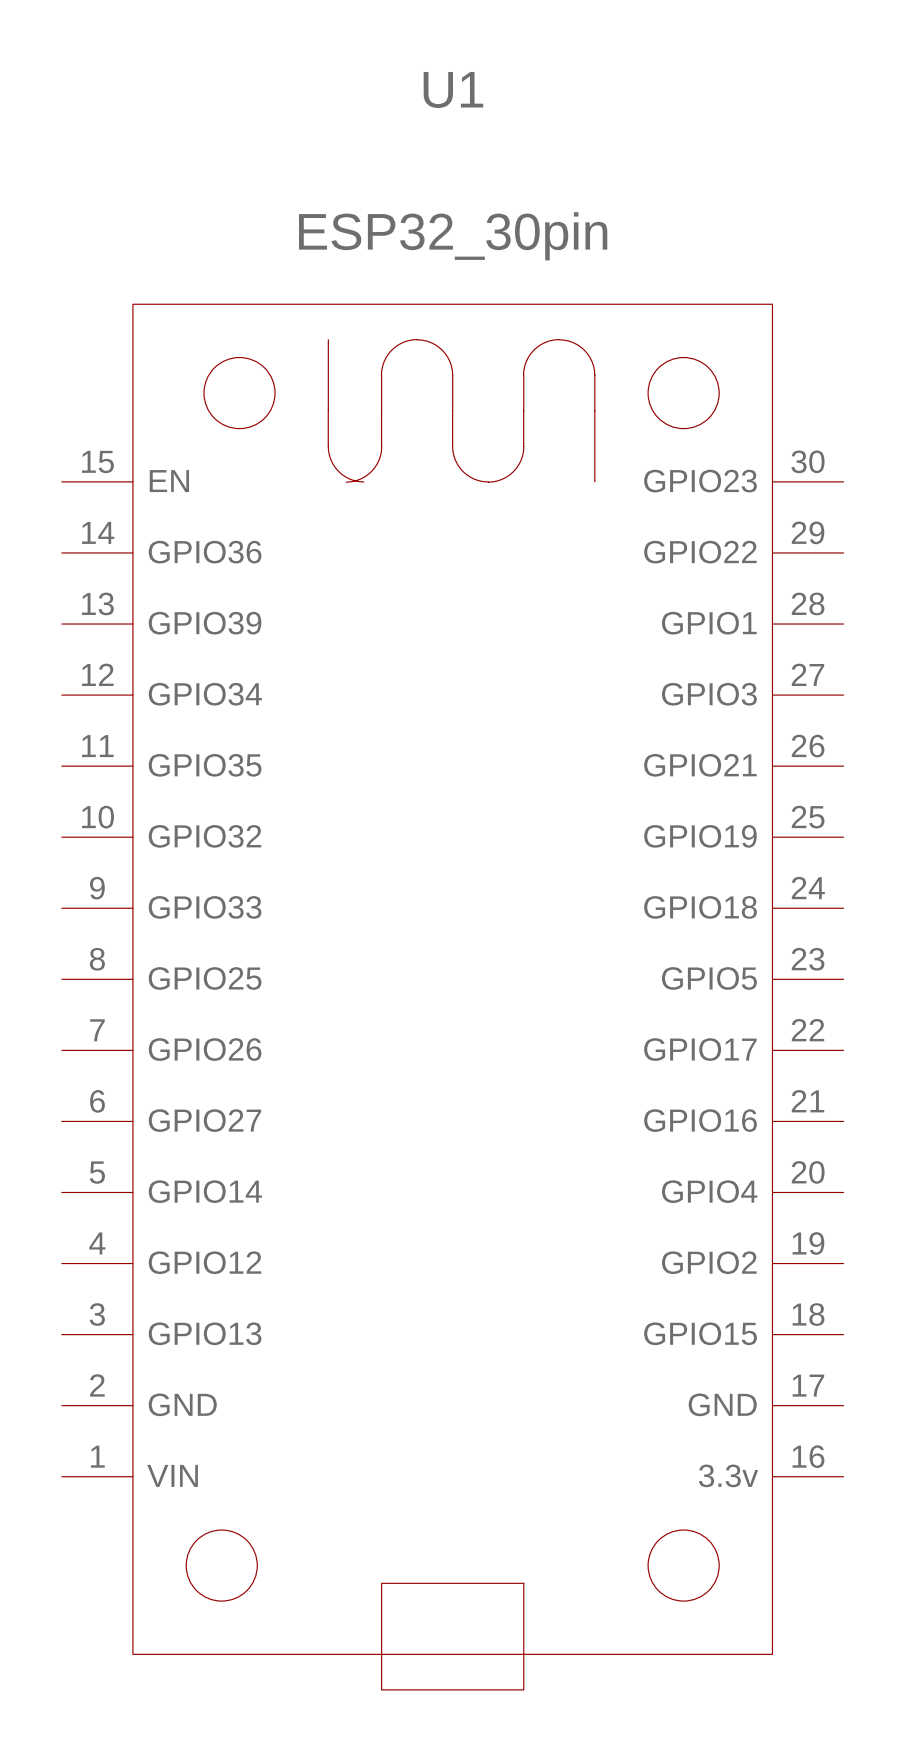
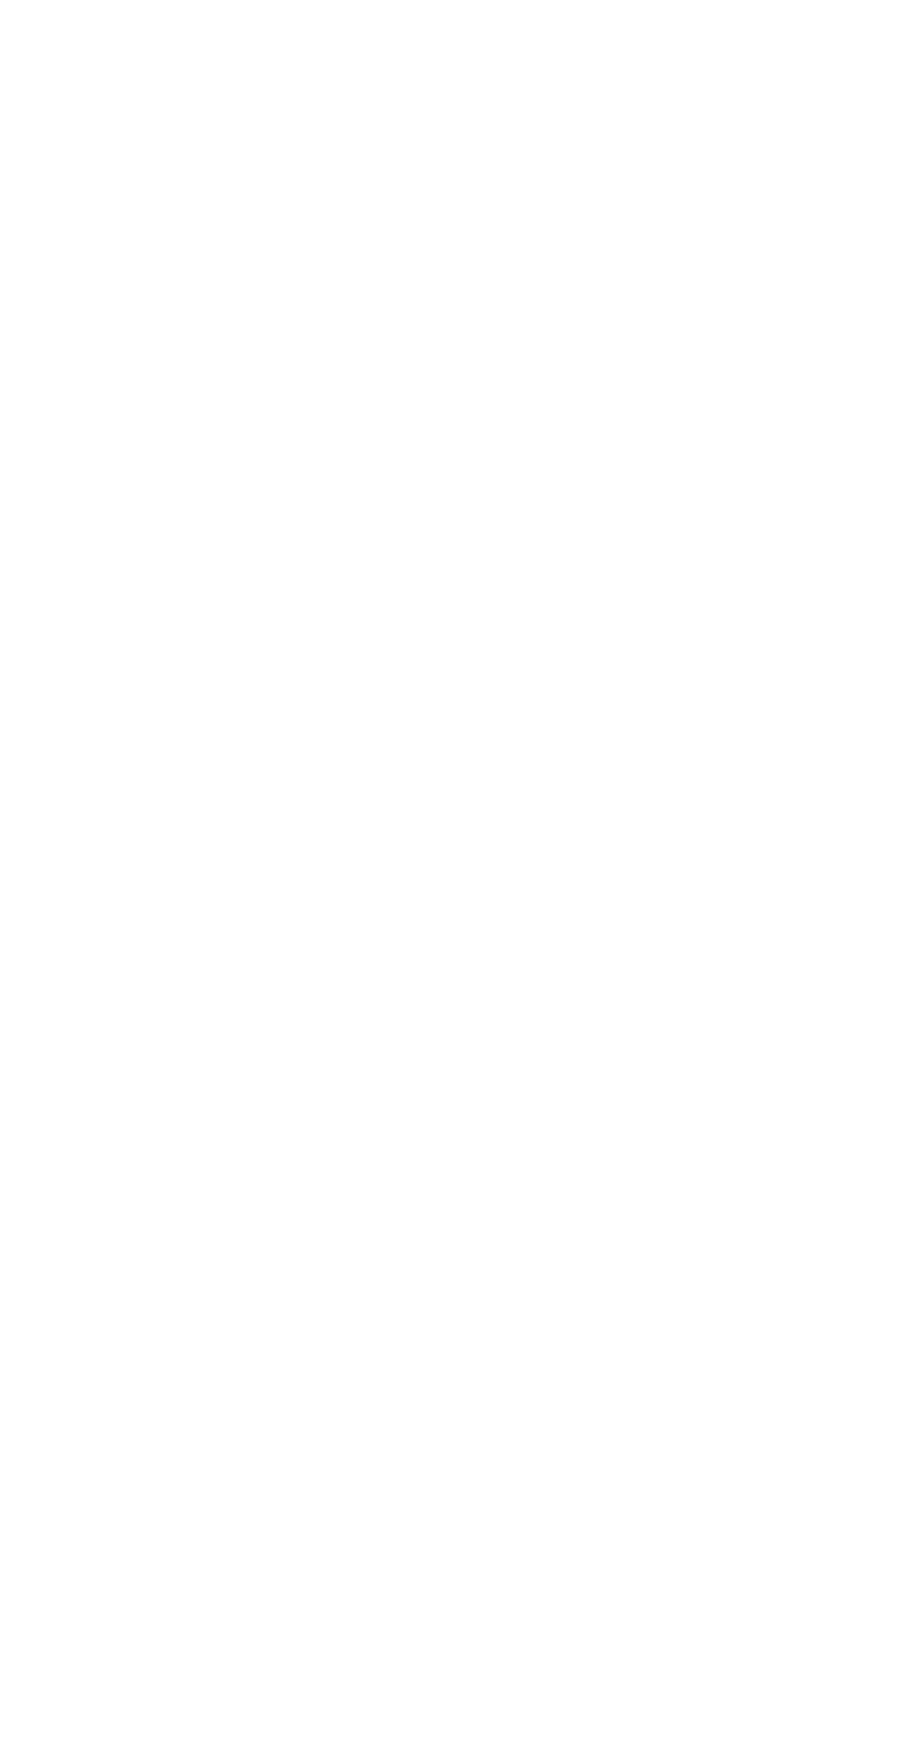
U1: (452, 997) -> none

